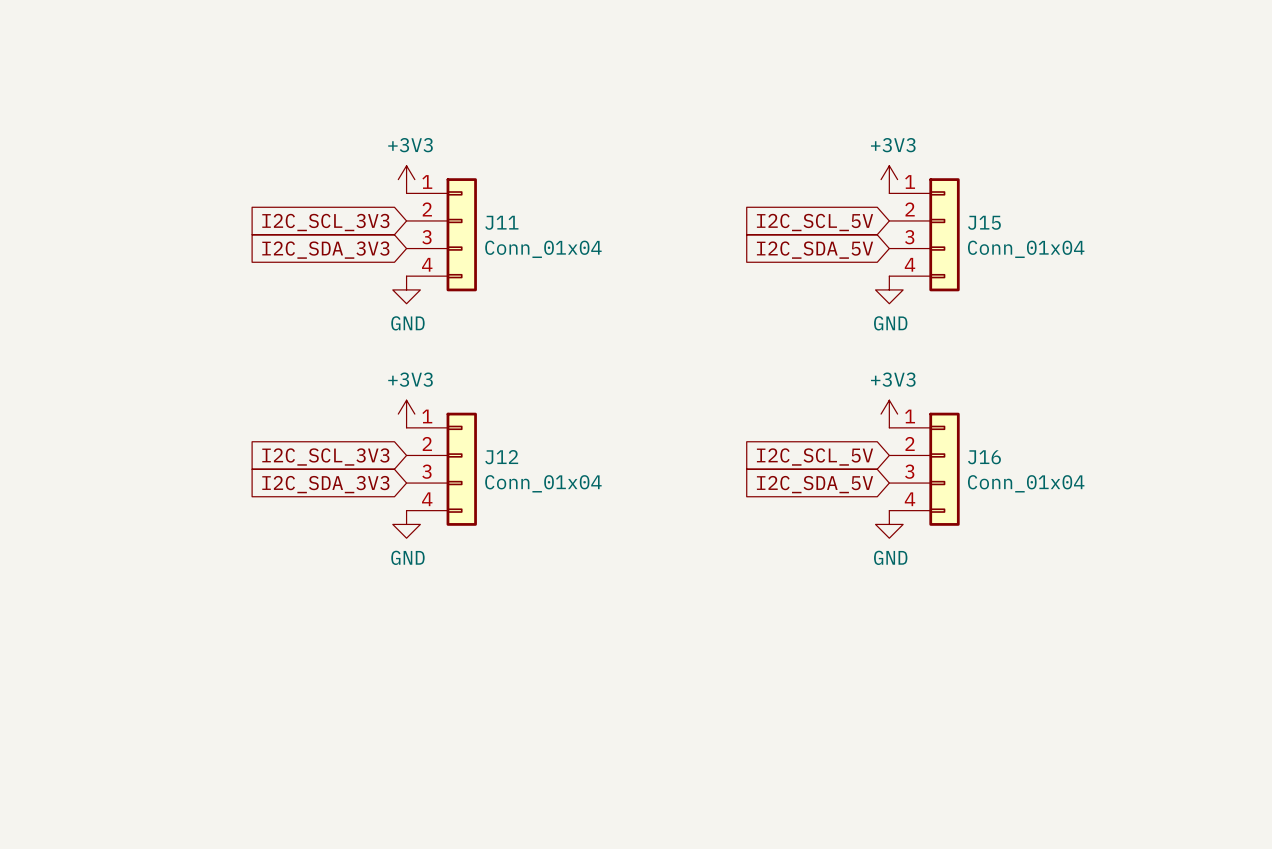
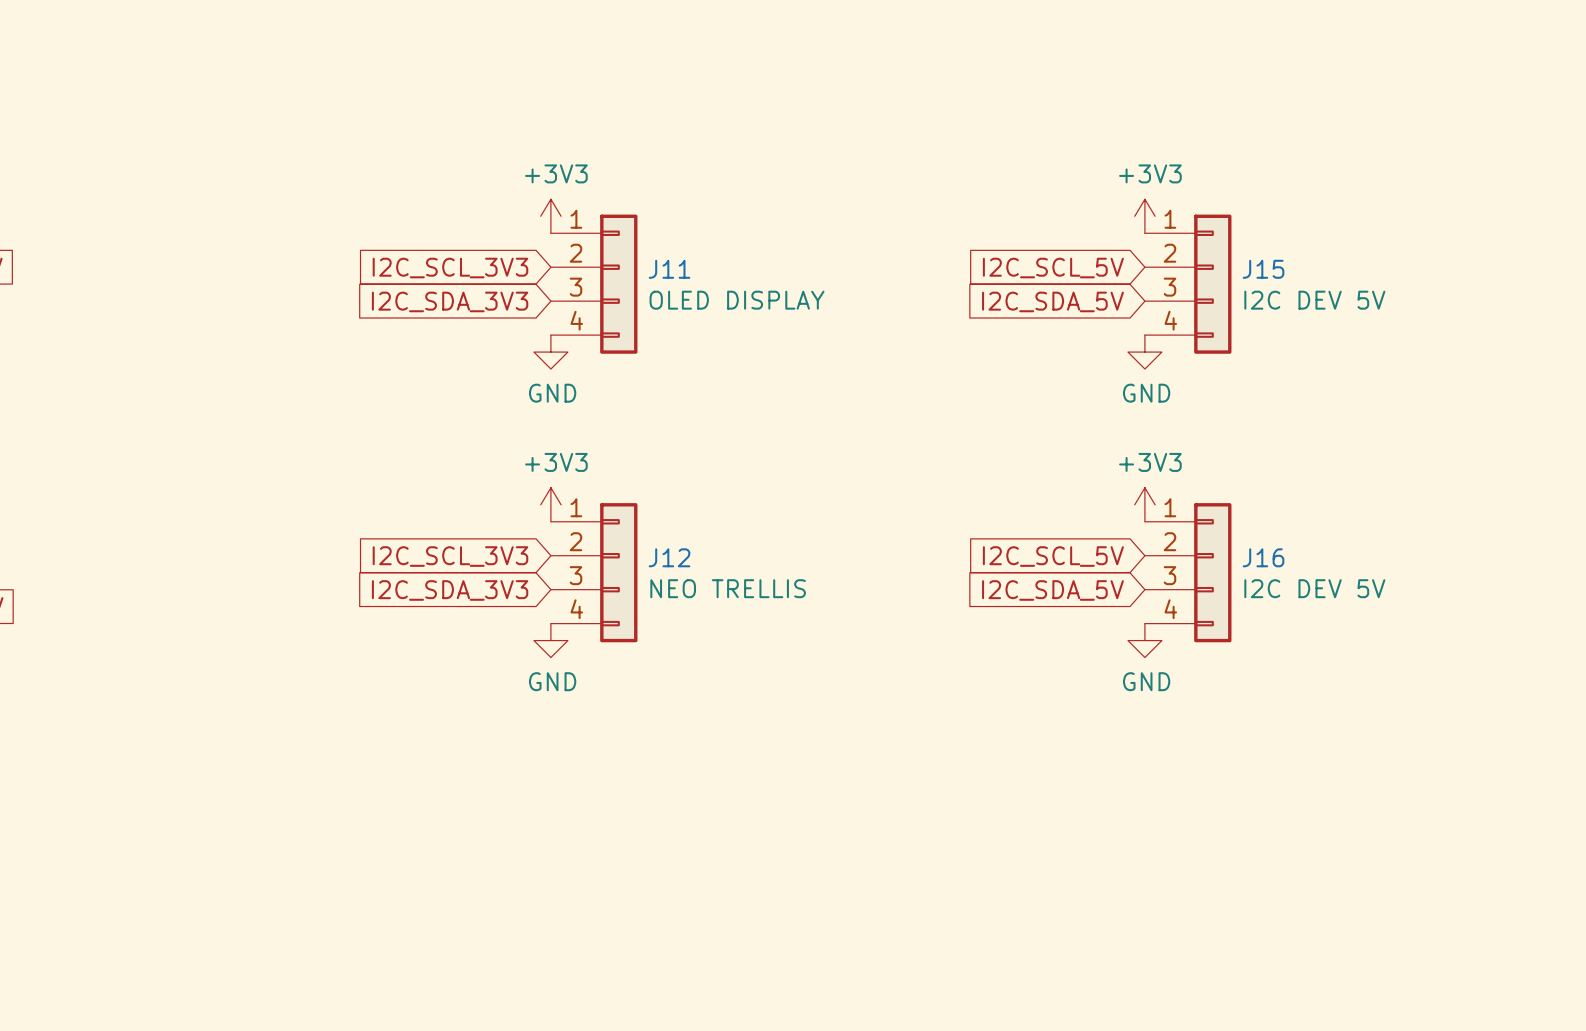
J11 value: Conn_01x04 (543, 249) -> OLED DISPLAY (737, 300)
J15 value: Conn_01x04 (1026, 249) -> I2C DEV 5V (1314, 300)
J12 value: Conn_01x04 (543, 483) -> NEO TRELLIS (728, 588)
J16 value: Conn_01x04 (1026, 483) -> I2C DEV 5V (1314, 588)

